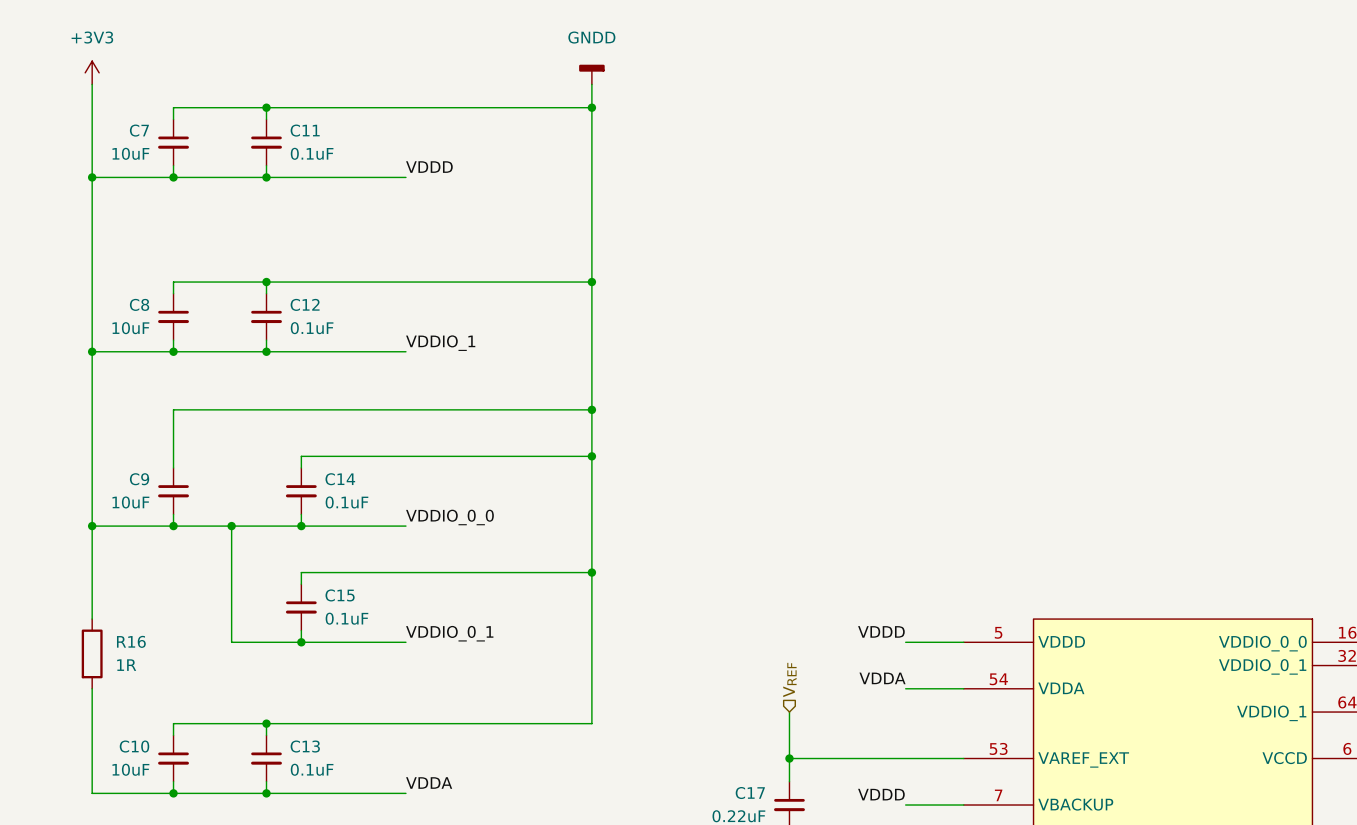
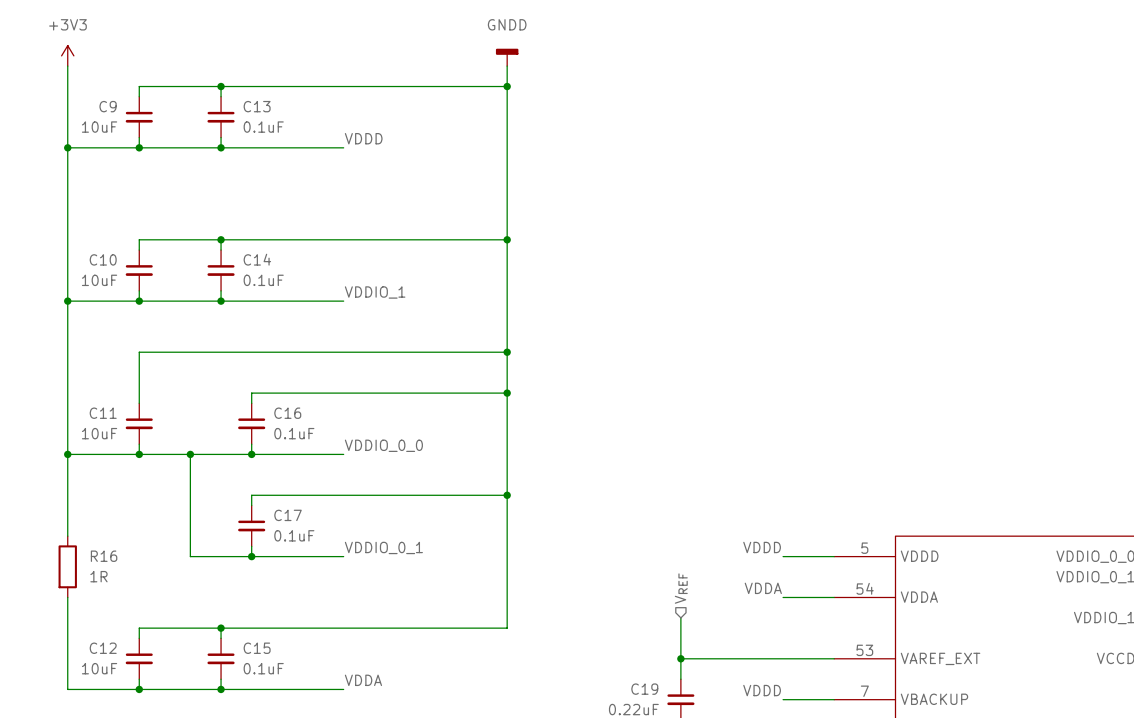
C7 name: C7 (139, 130) -> C9 (108, 106)
C11 name: C11 (305, 130) -> C13 (257, 106)
C8 name: C8 (139, 304) -> C10 (103, 259)
C12 name: C12 (305, 304) -> C14 (257, 259)
C9 name: C9 (139, 479) -> C11 (103, 413)
C14 name: C14 (340, 479) -> C16 (287, 413)
C15 name: C15 (340, 595) -> C17 (288, 515)
C10 name: C10 (134, 746) -> C12 (103, 648)
C13 name: C13 (305, 746) -> C15 (257, 648)
C17 name: C17 (750, 793) -> C19 (644, 689)

